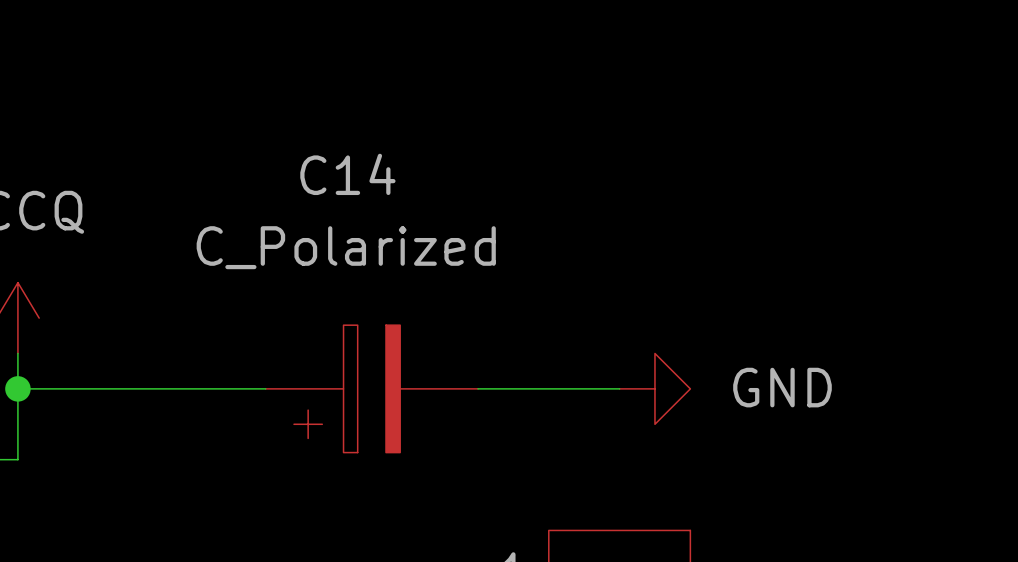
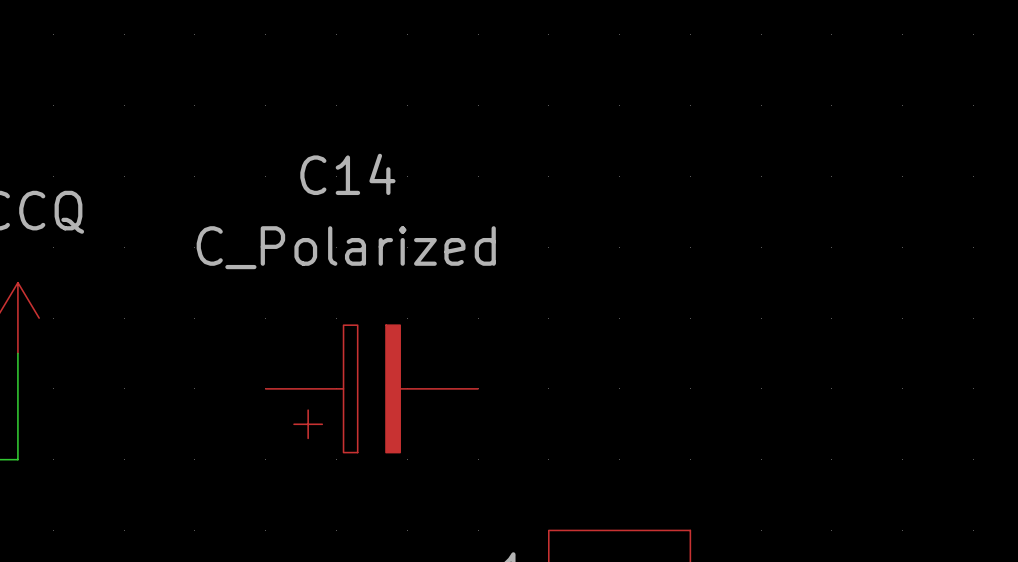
wire: (17, 388) (265, 388) -> none
junction: (17, 388) -> none
wire: (478, 388) (619, 388) -> none
power symbol: GND (654, 388) -> none

